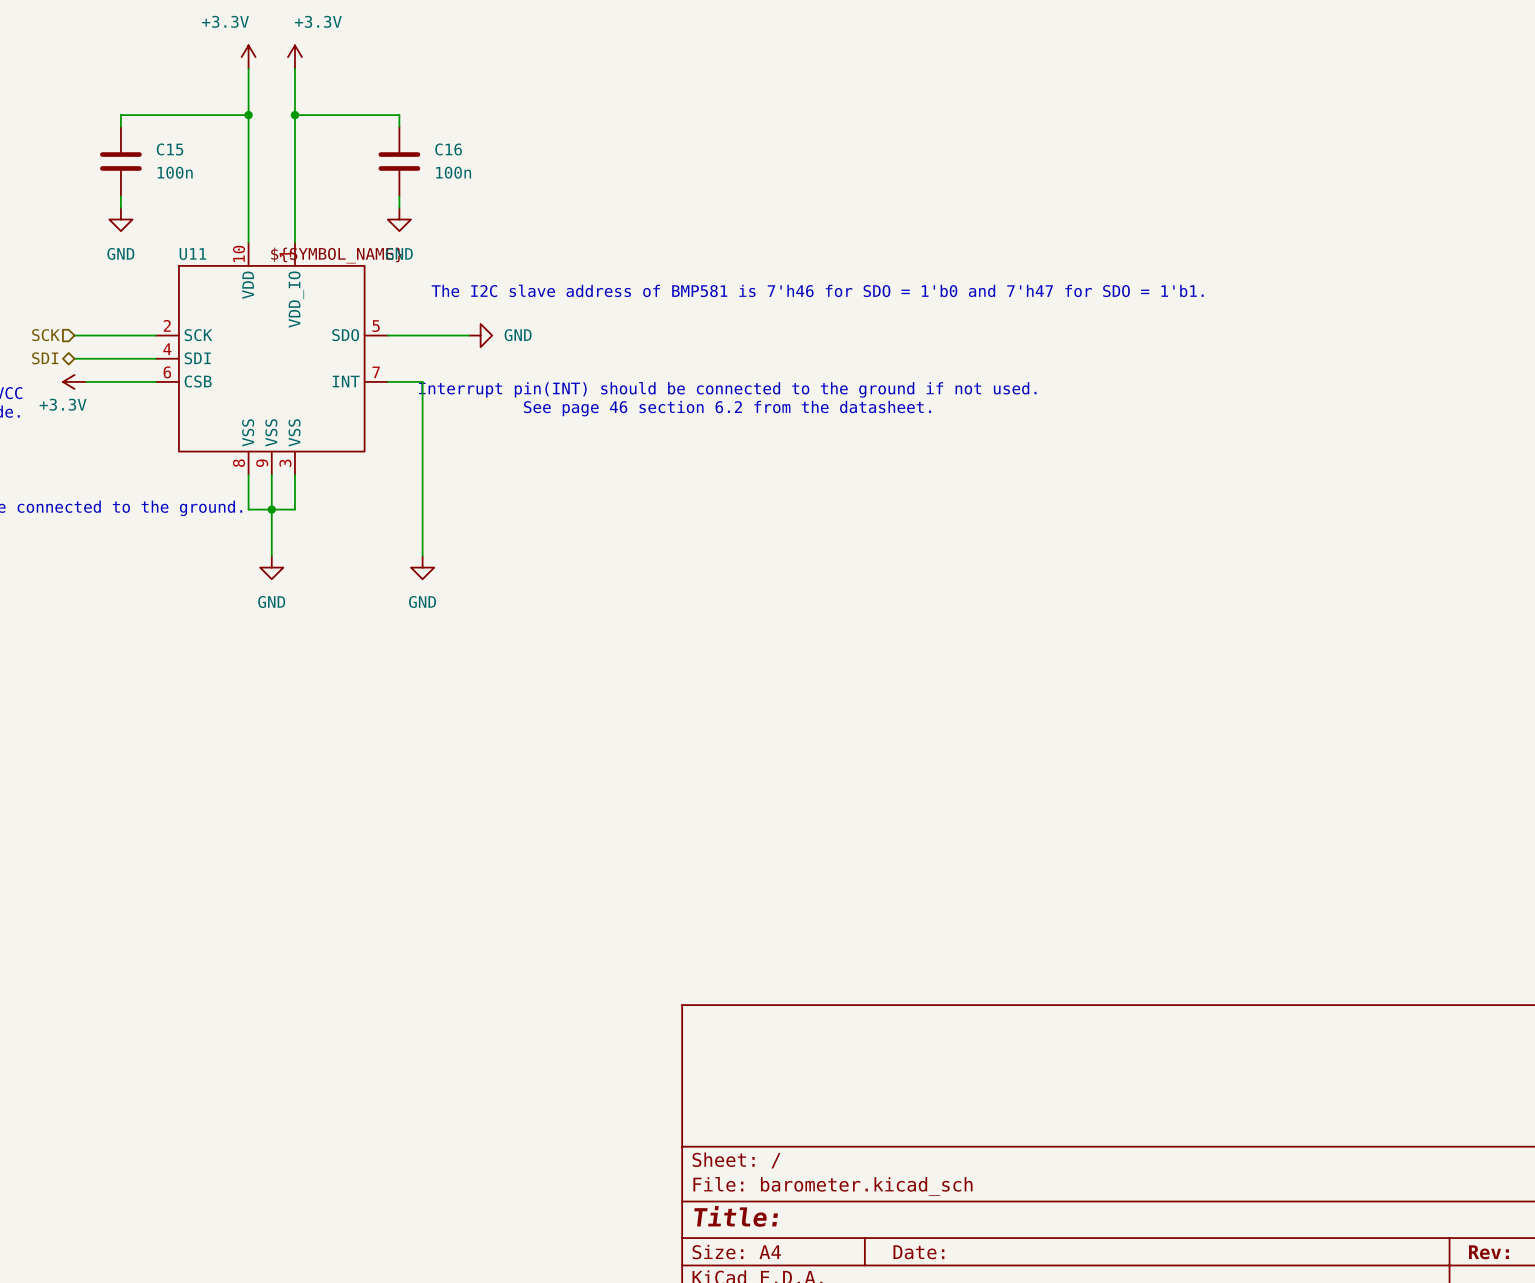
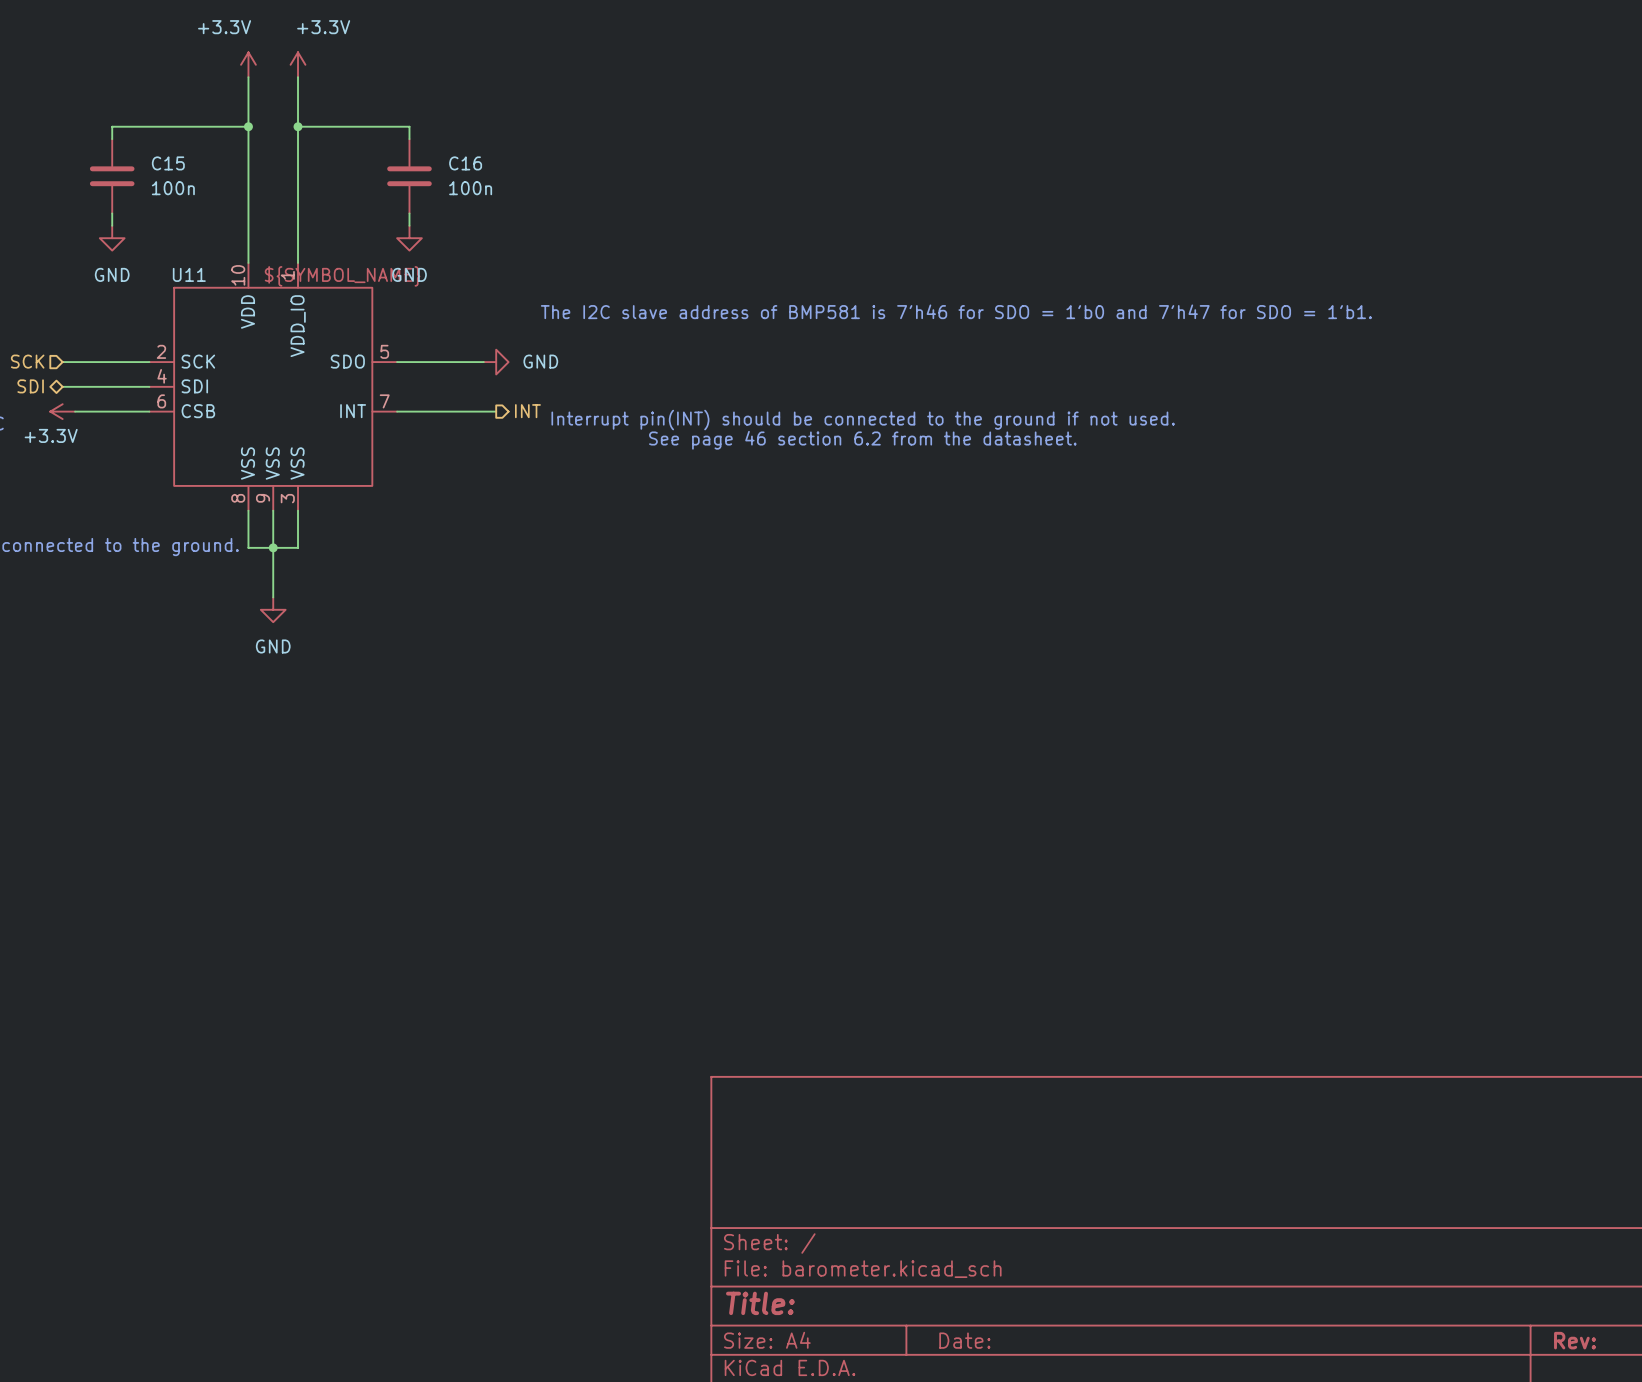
text position: The I2C slave address of BMP581 is 7'h46 for SDO = 1'b0 and 7'h47 for SDO = 1'b1. (817, 290) -> The I2C slave address of BMP581 is 7'h46 for SDO = 1'b0 and 7'h47 for SDO = 1'b1. (956, 311)
wire: (422, 381) (422, 555) -> (434, 411) (496, 411)
hierarchical label: none -> INT (527, 411)
text position: Interrupt pin(INT) should be connected to the ground if not used. (727, 389) -> Interrupt pin(INT) should be connected to the ground if not used. (863, 420)
text position: See page 46 section 6.2 from the datasheet. (727, 408) -> See page 46 section 6.2 from the datasheet. (862, 440)
power symbol: GND (422, 567) -> none

